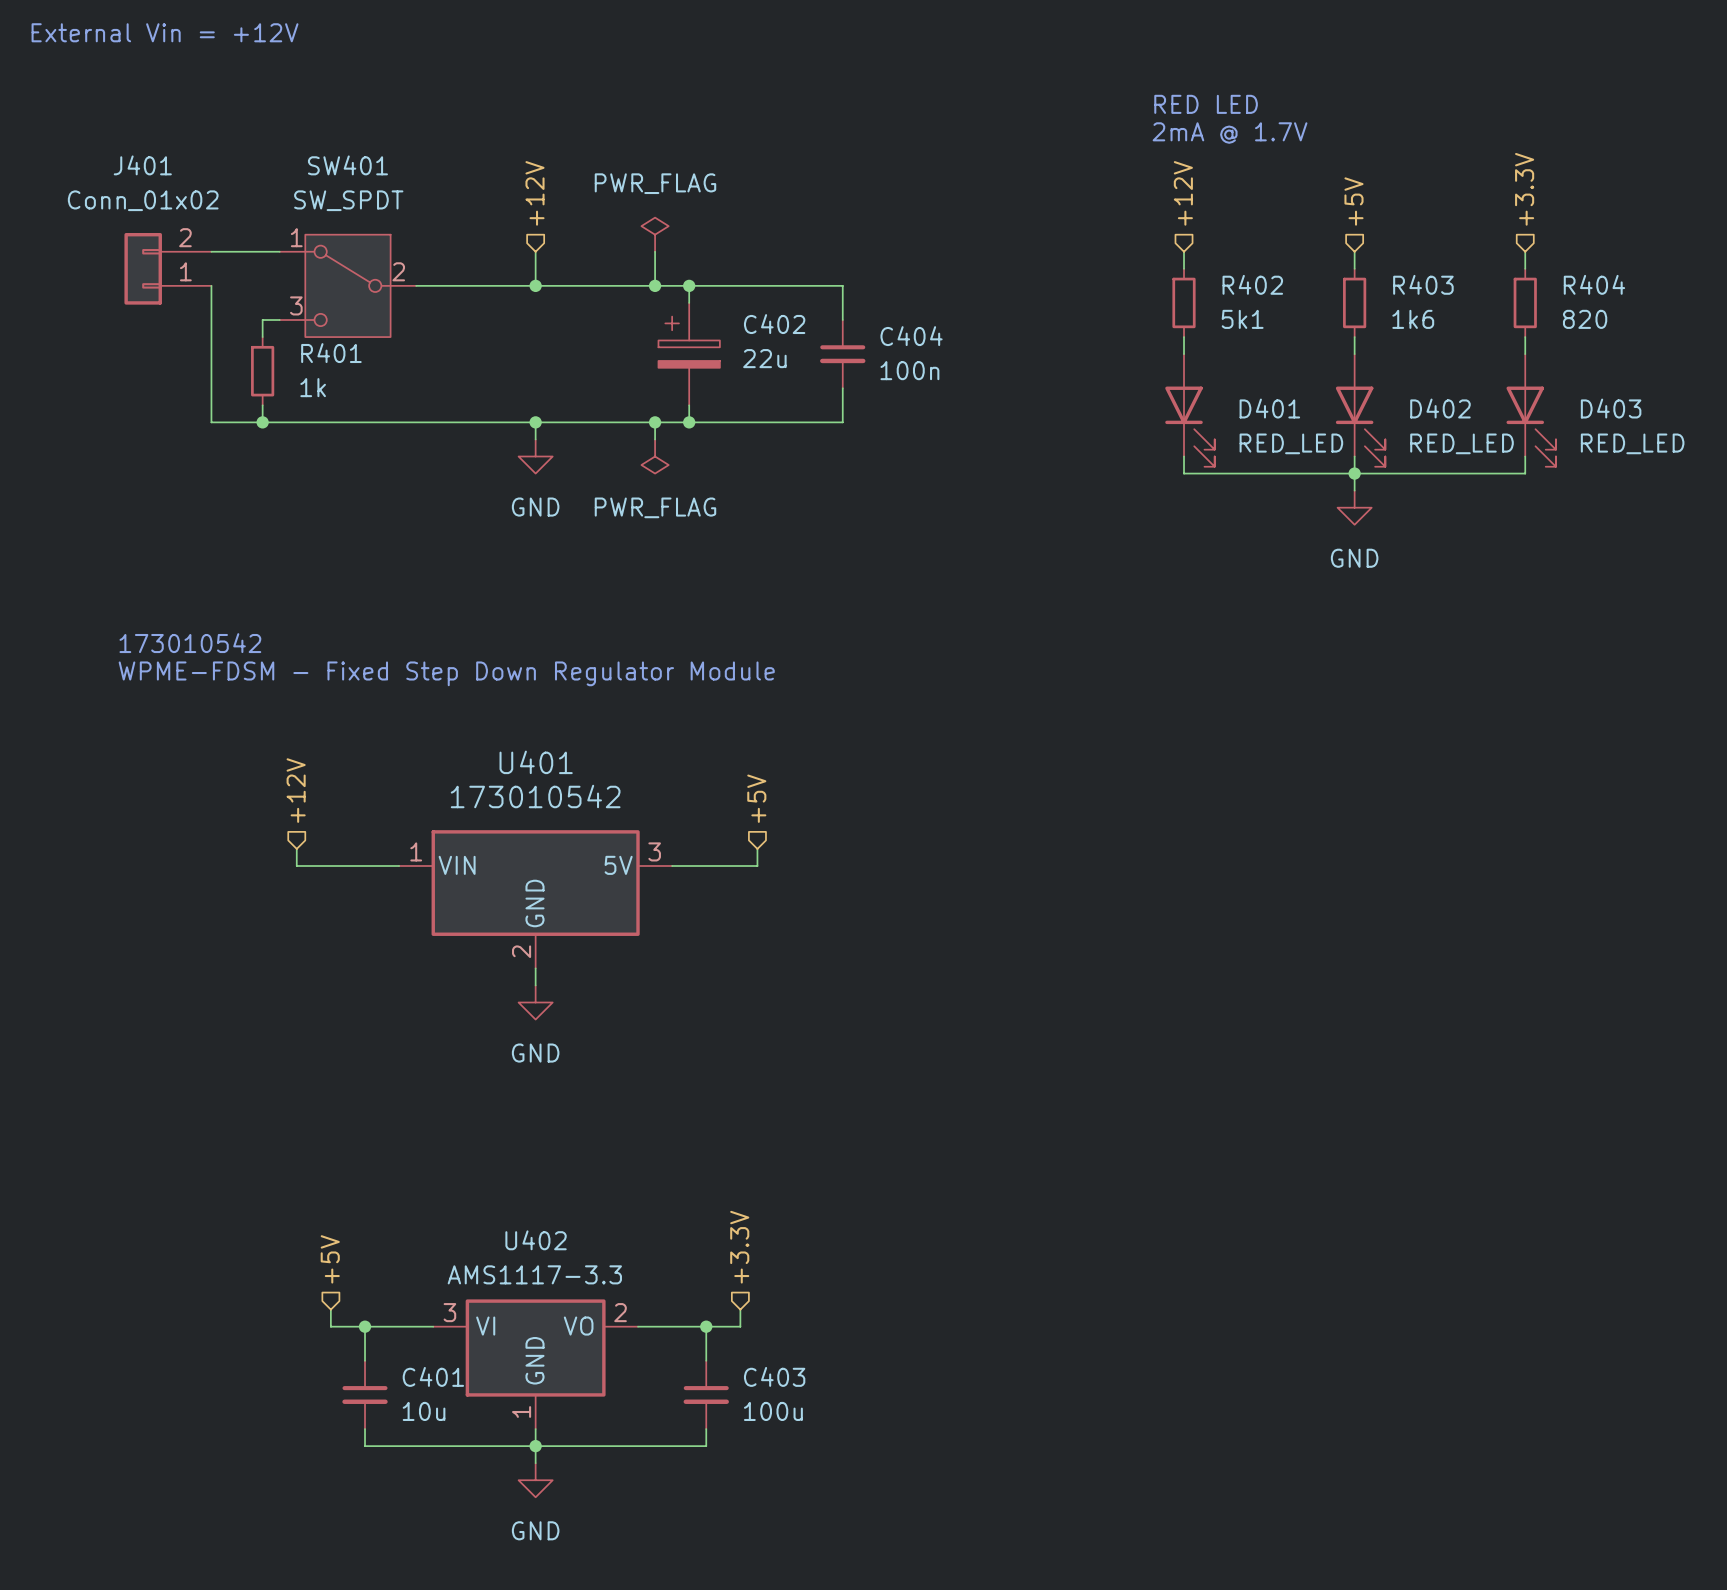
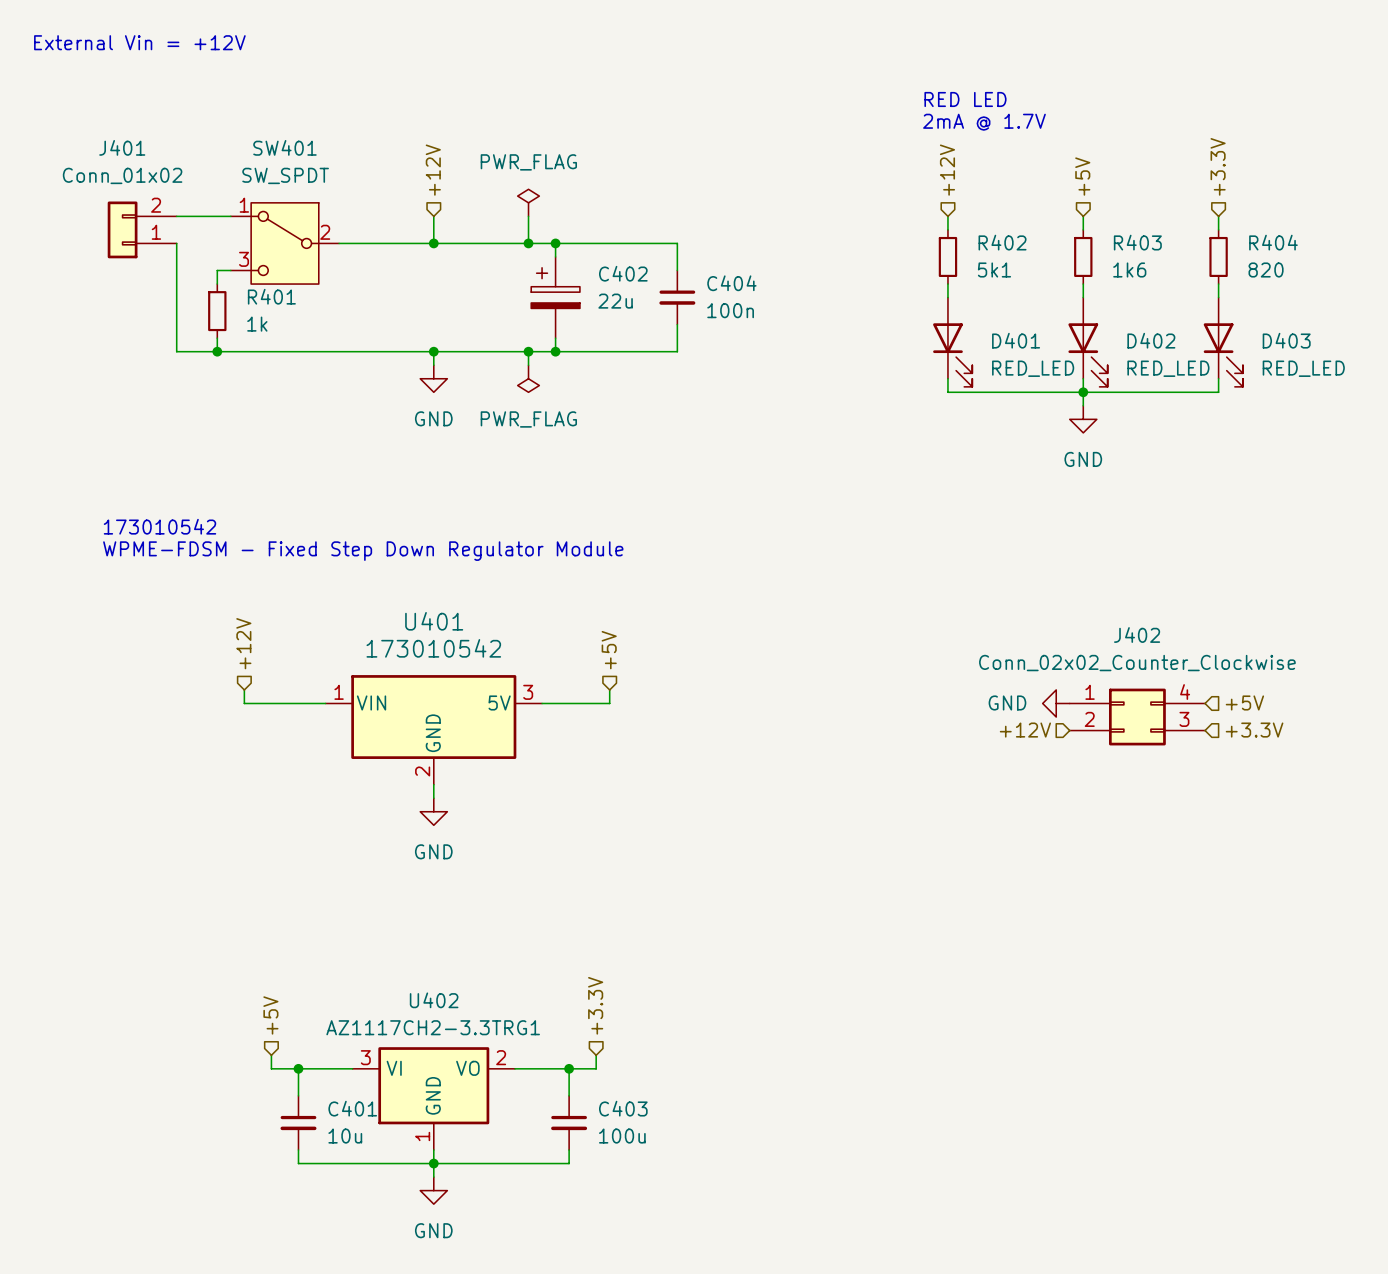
hierarchical label: none -> +5V (1244, 702)
power symbol: none -> GND (1056, 703)
J402: none -> Conn_02x02_Counter_Clockwise (1137, 717)
hierarchical label: none -> +12V (1025, 730)
hierarchical label: none -> +3.3V (1254, 730)
U402 value: AMS1117-3.3 (534, 1274) -> AZ1117CH2-3.3TRG1 (433, 1027)

